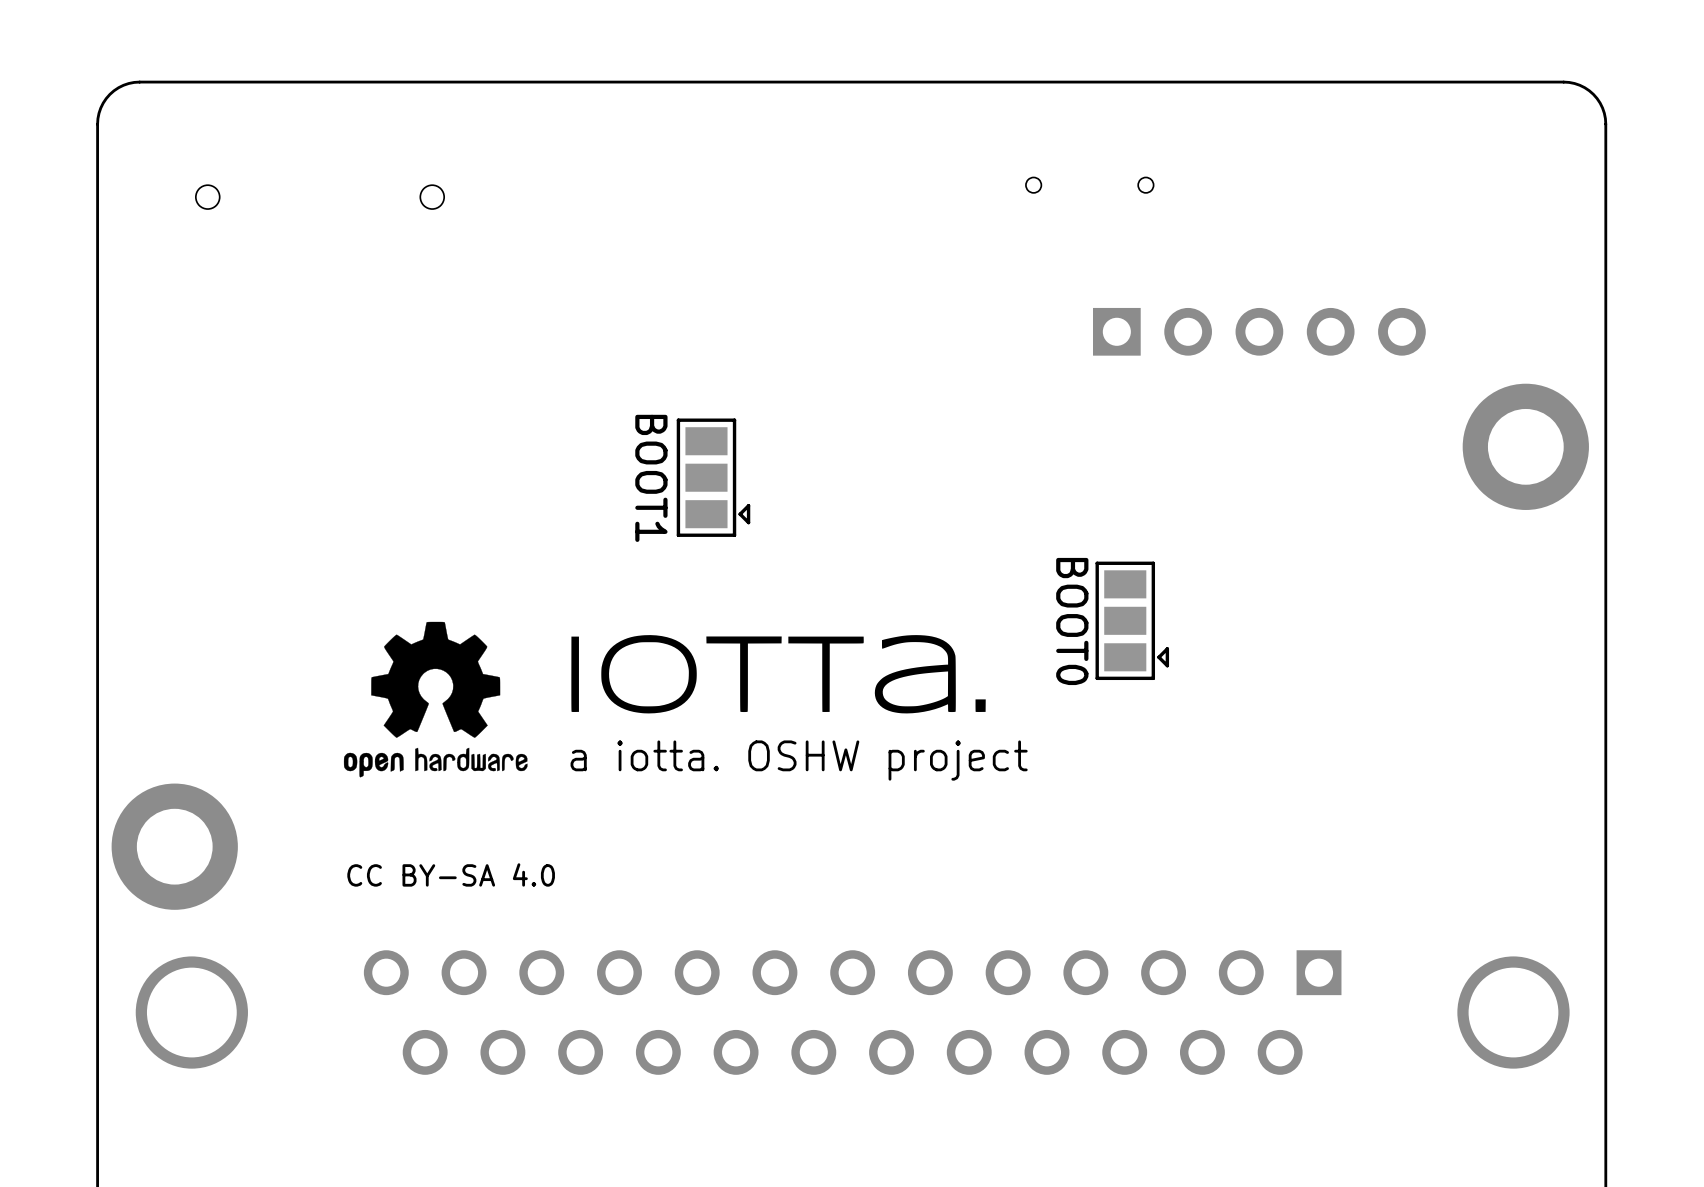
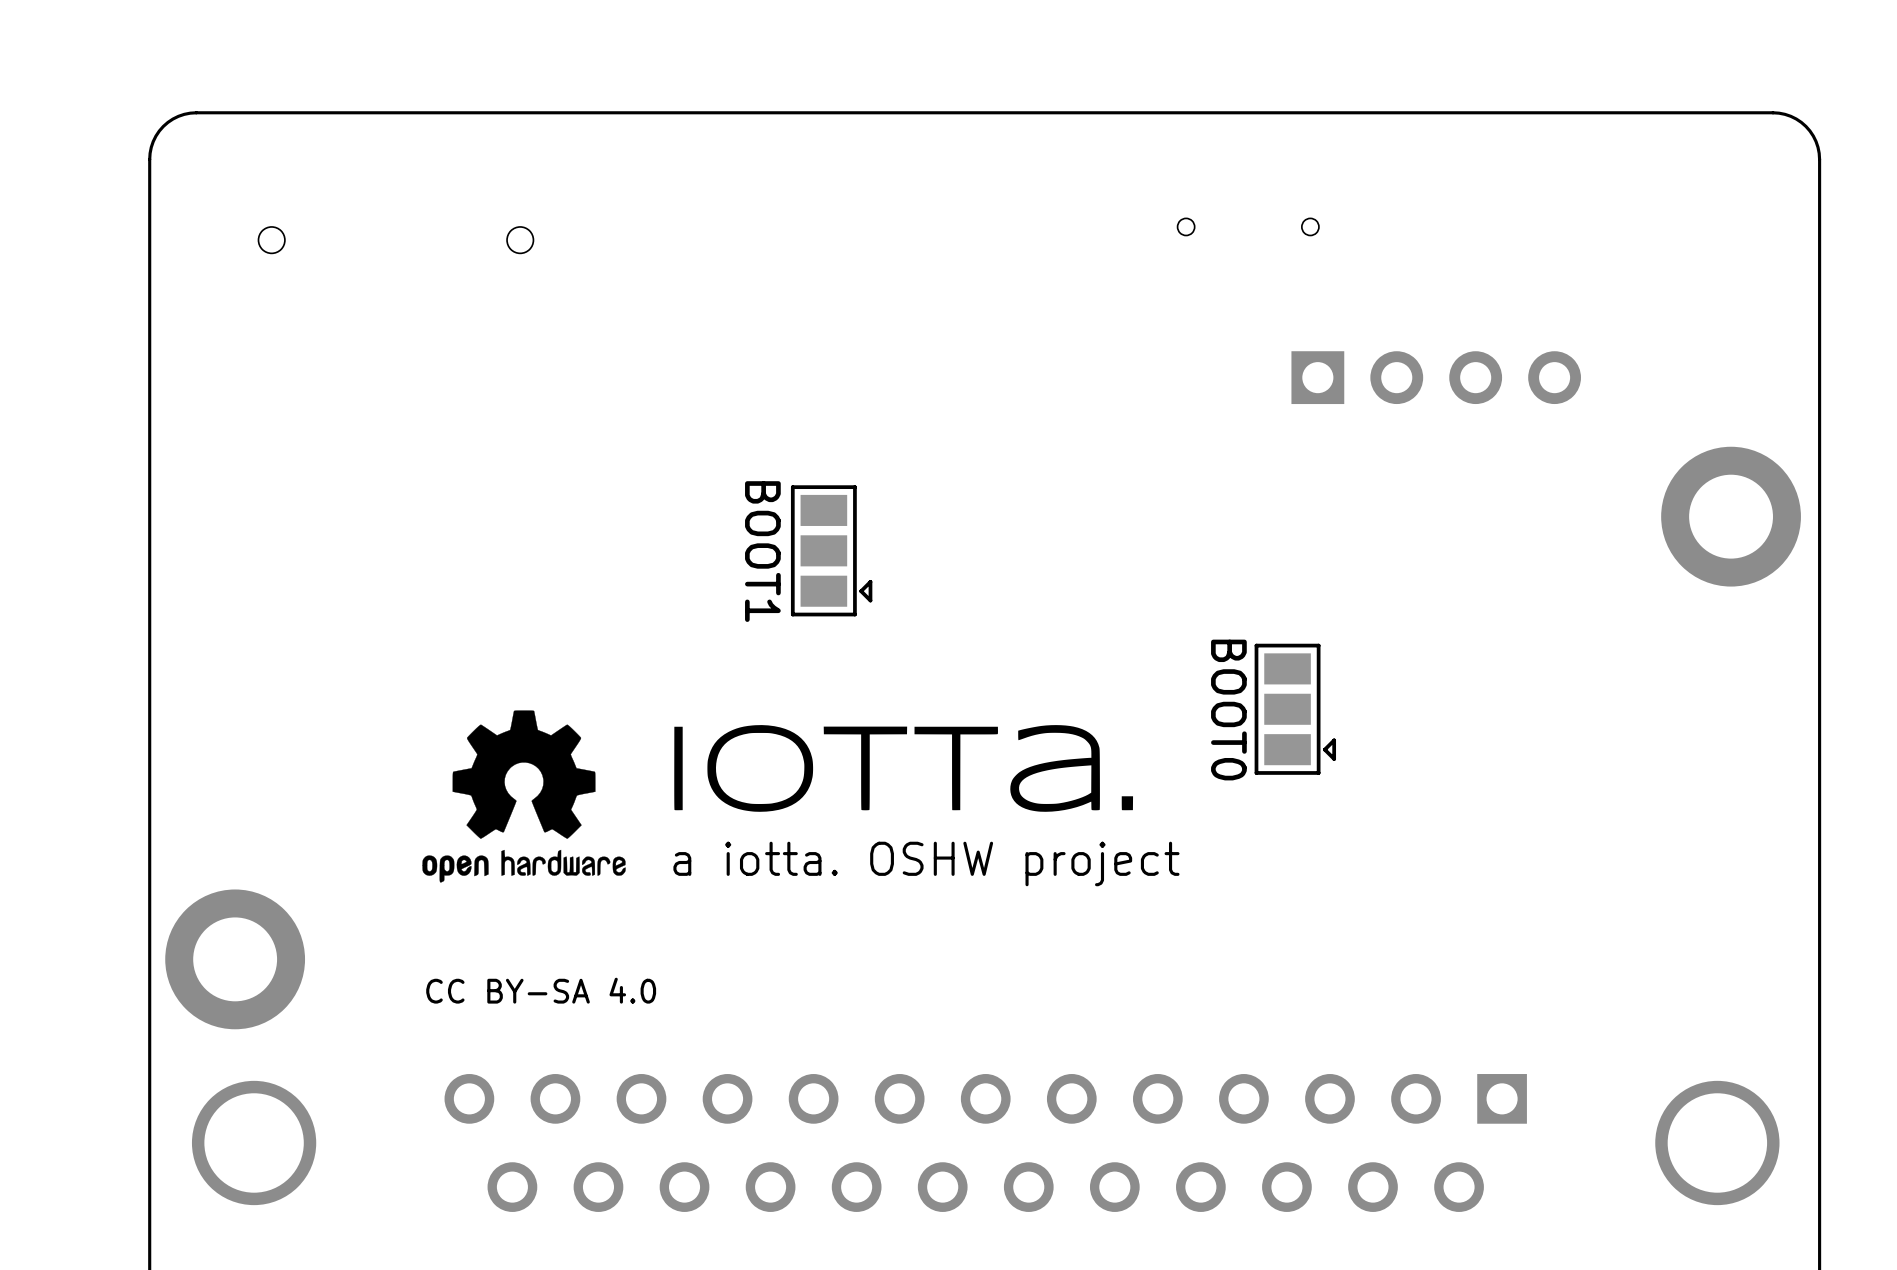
part footprint: [1093, 307, 1426, 356] -> [1291, 351, 1581, 405]

